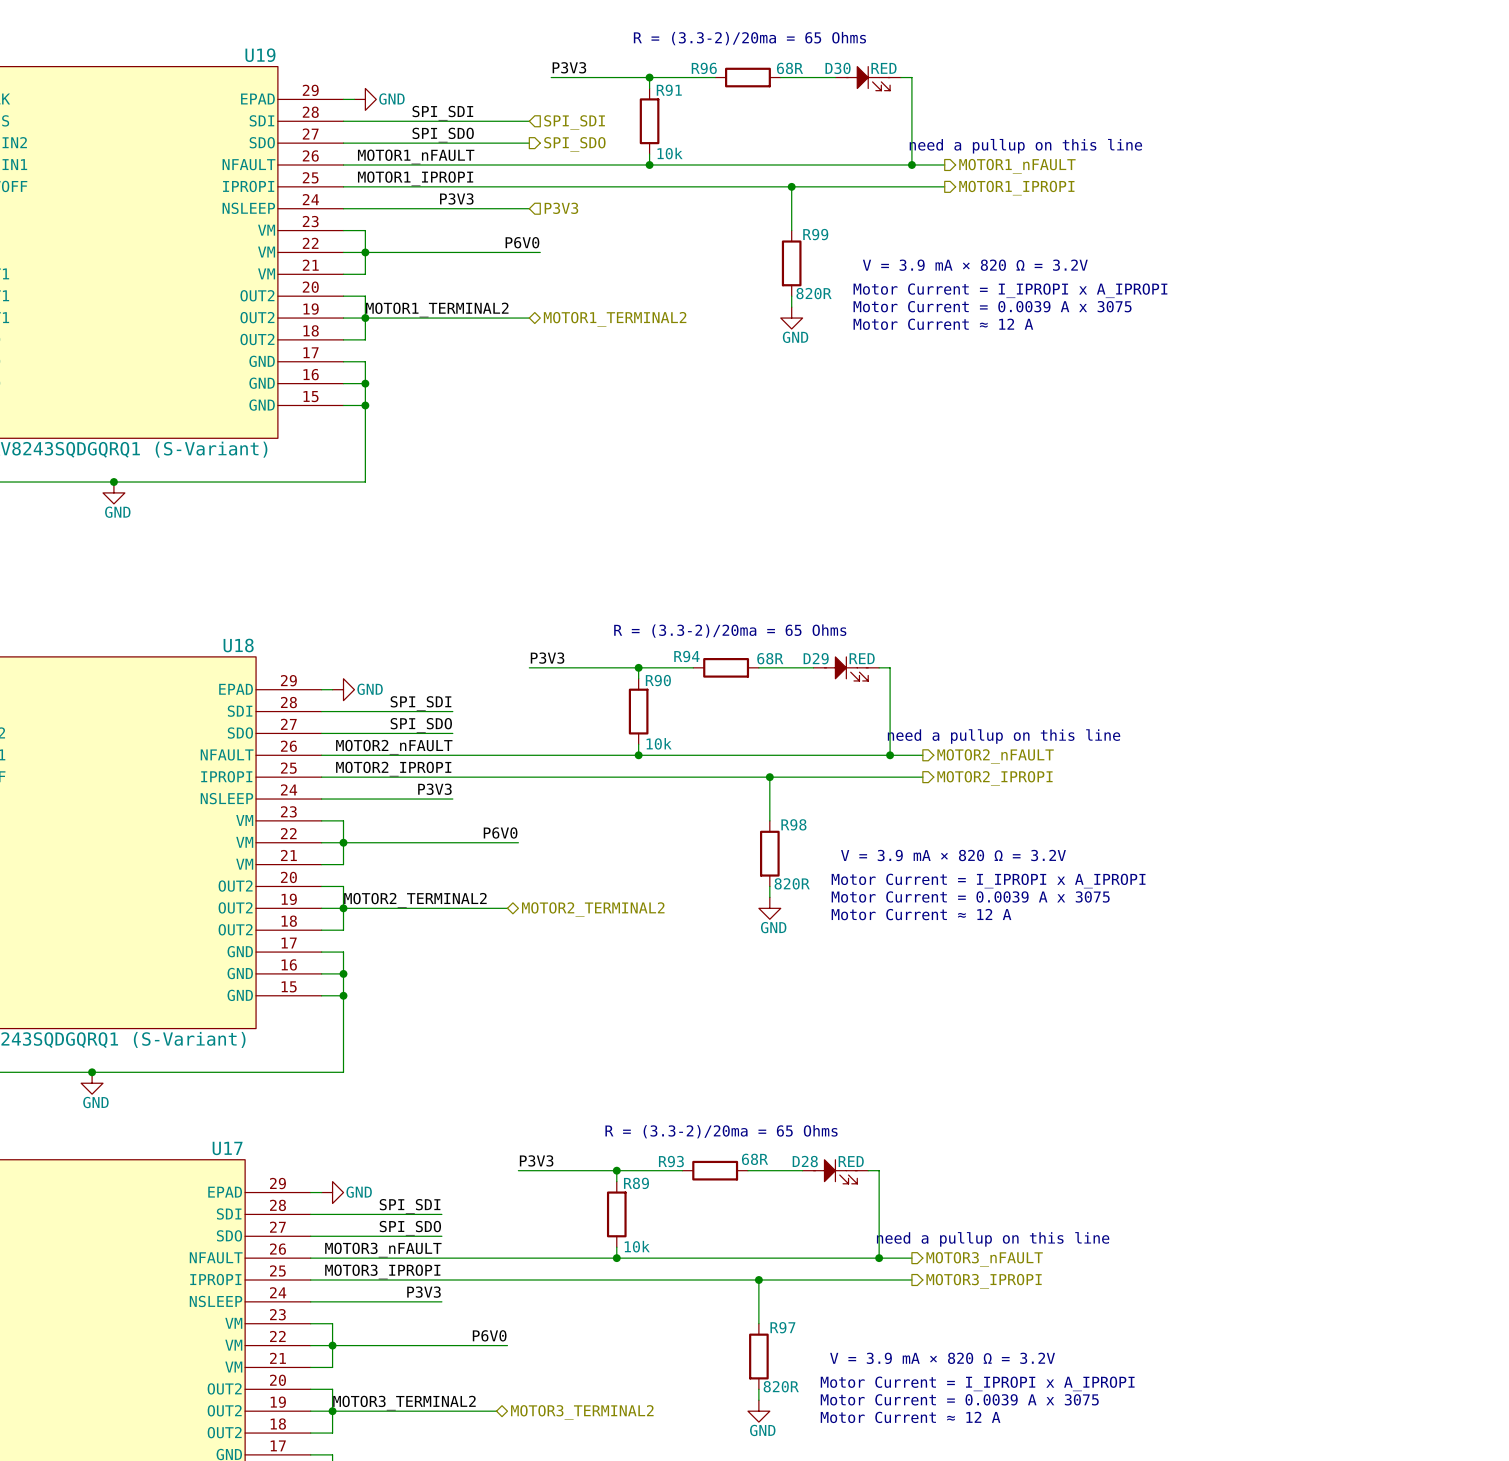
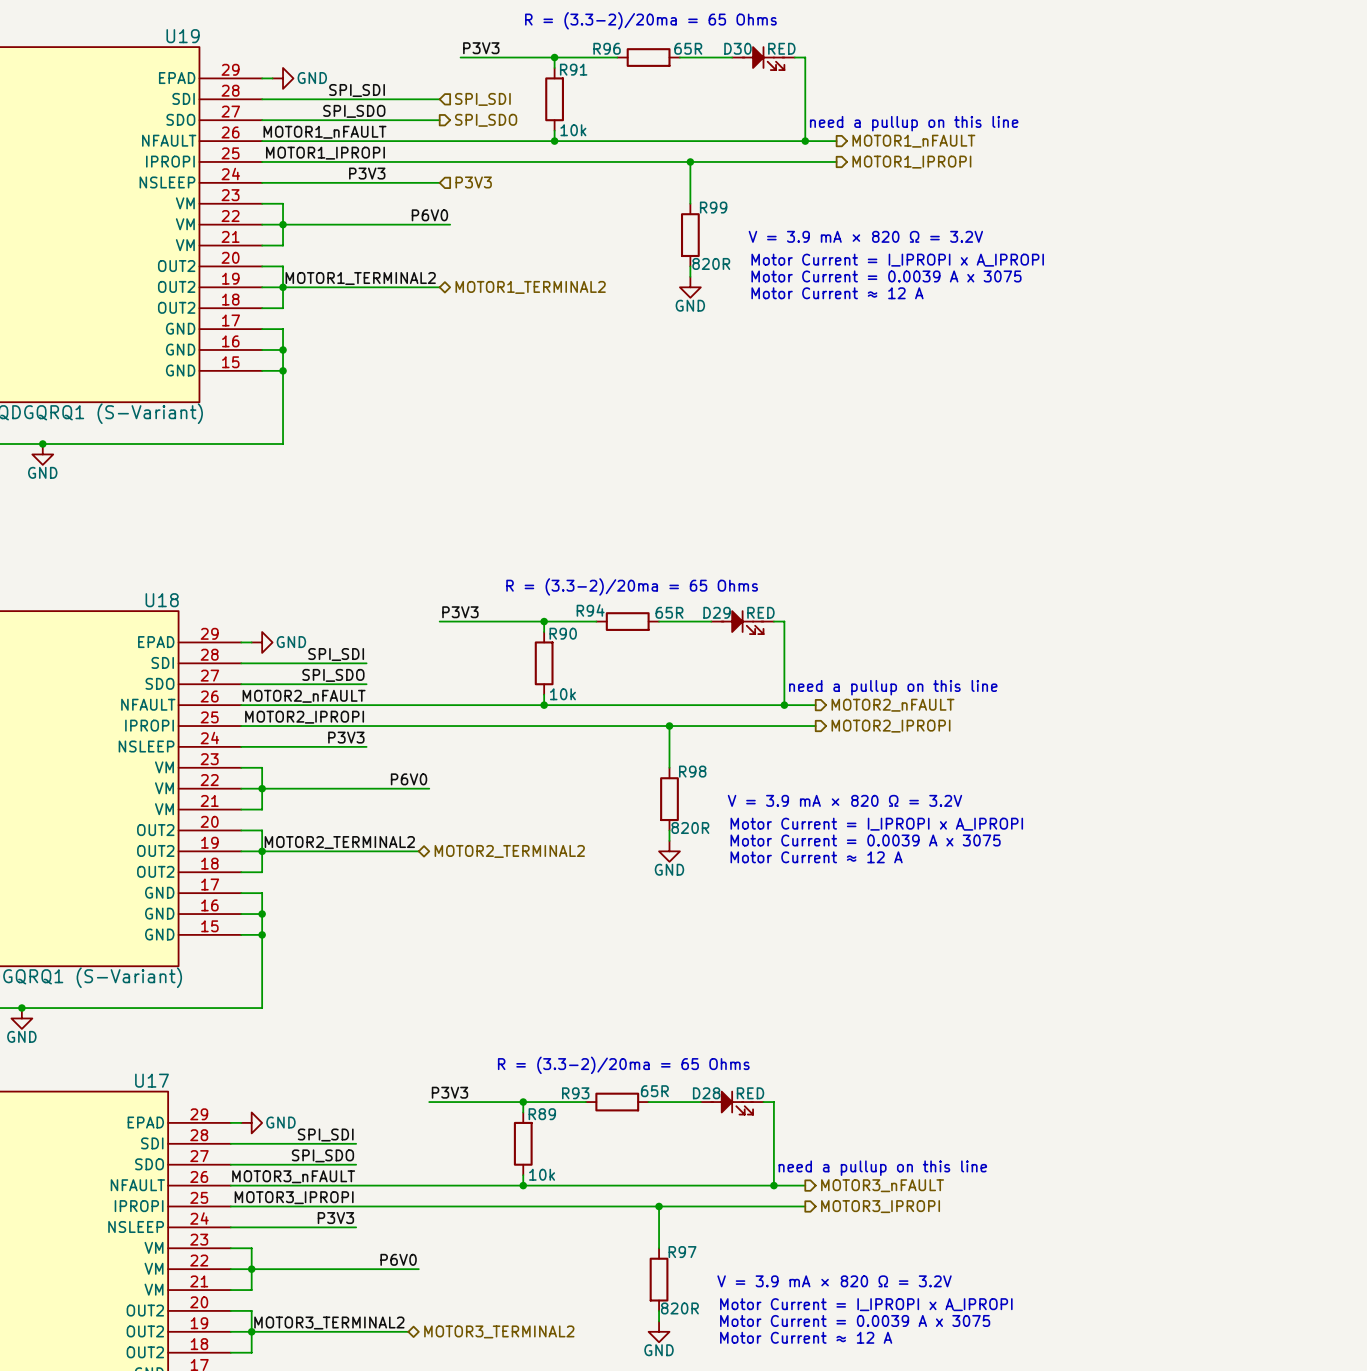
R96 value: 68R (789, 68) -> 65R (688, 48)
R94 value: 68R (770, 658) -> 65R (669, 612)
R93 value: 68R (755, 1159) -> 65R (654, 1091)

